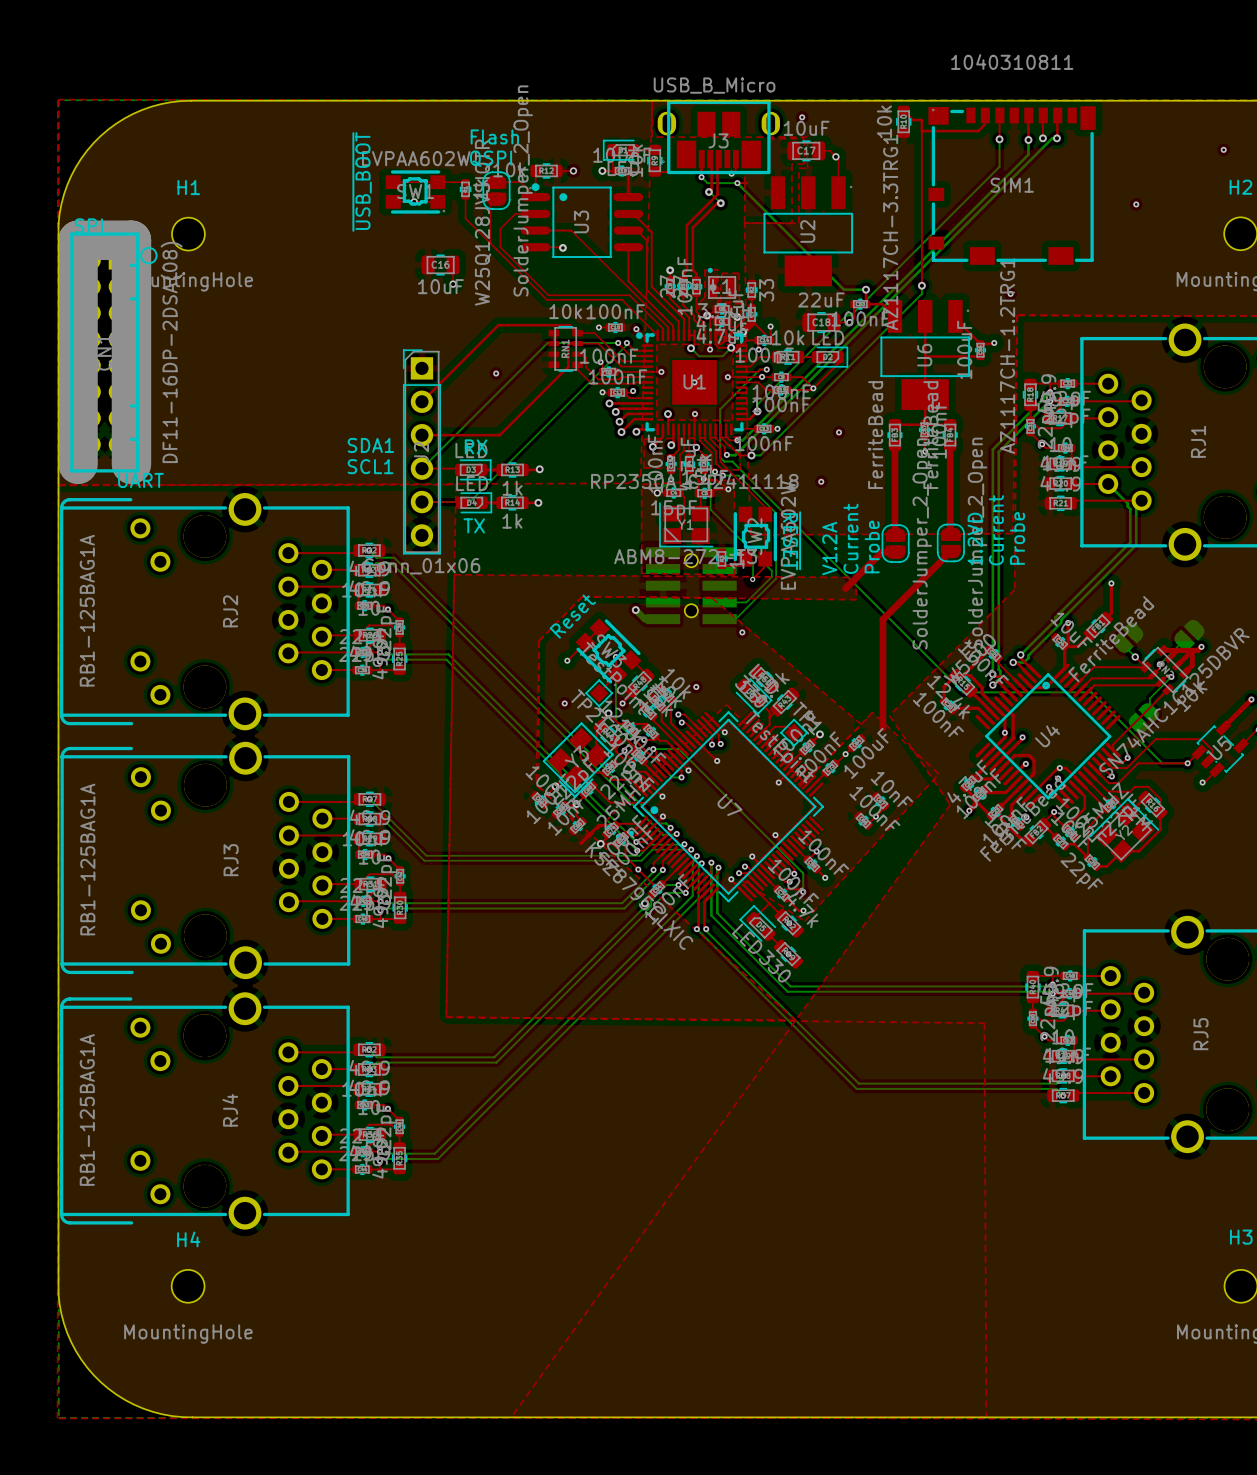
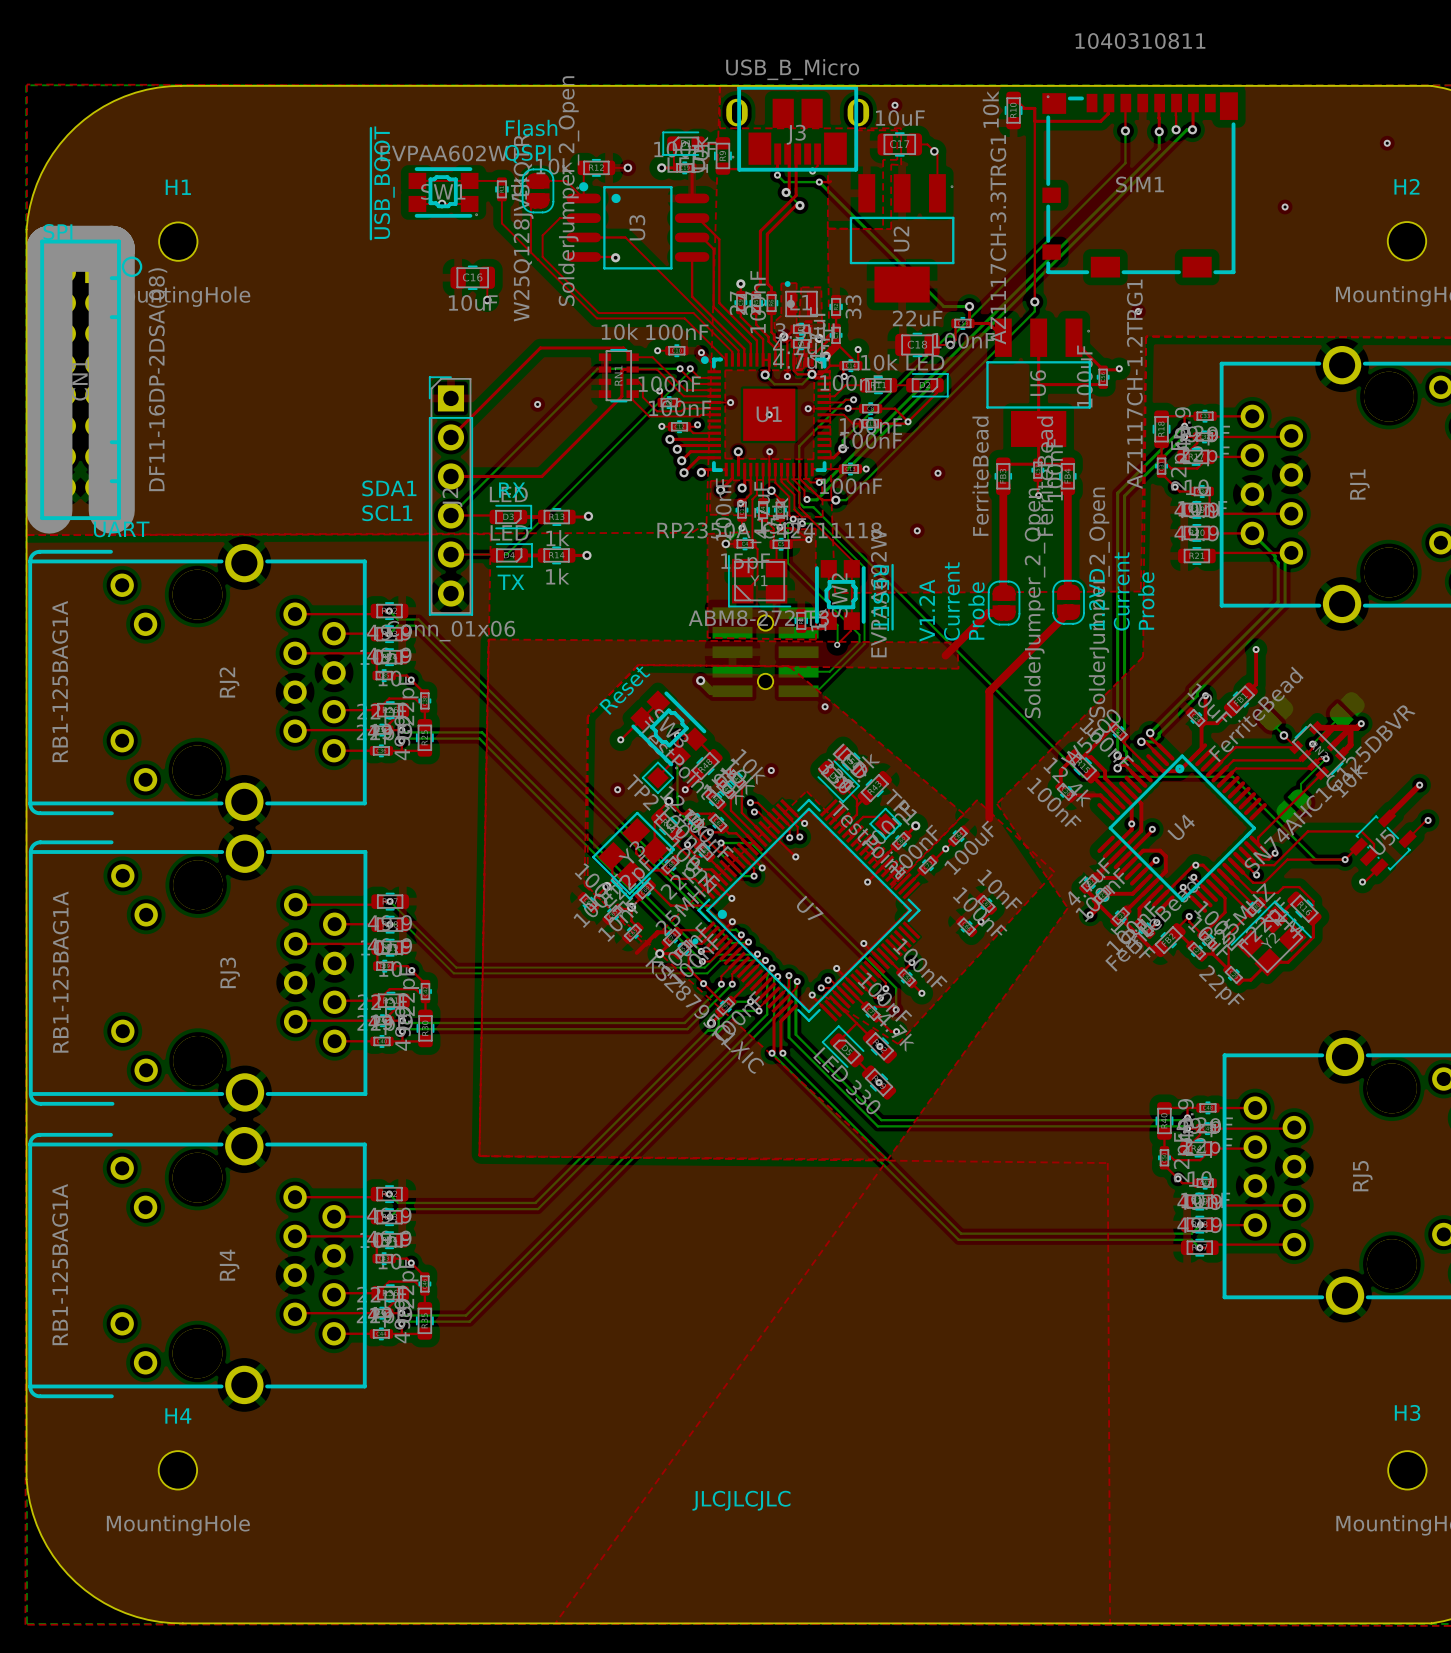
text: none -> JLCJLCJLC (741, 1500)

